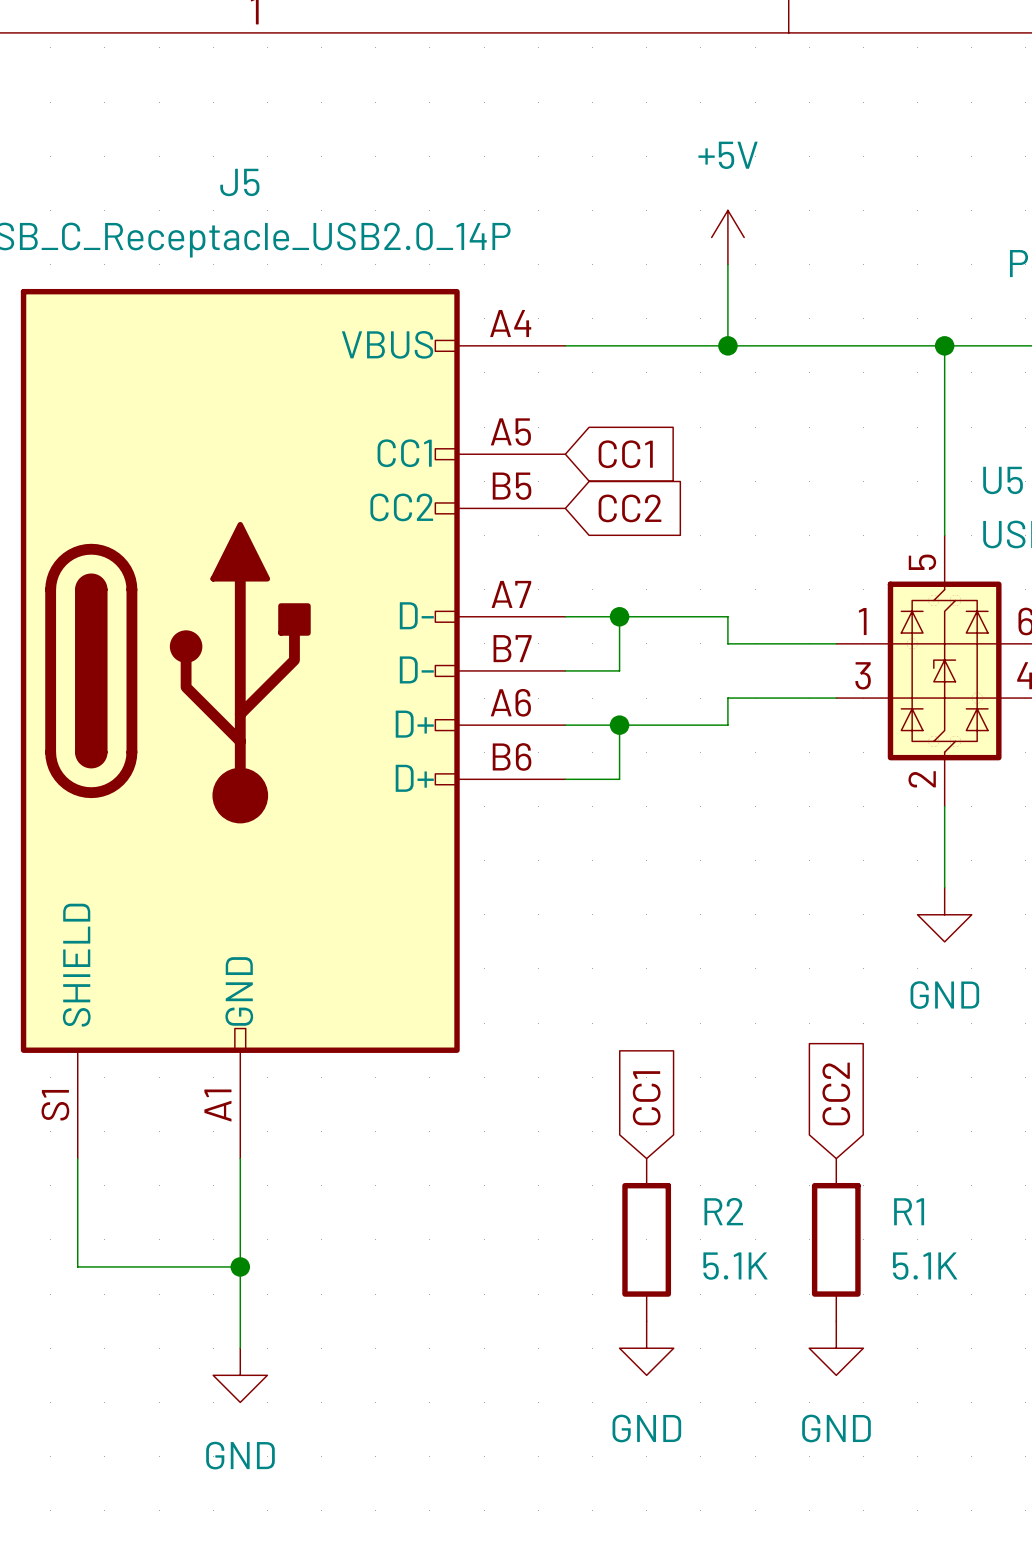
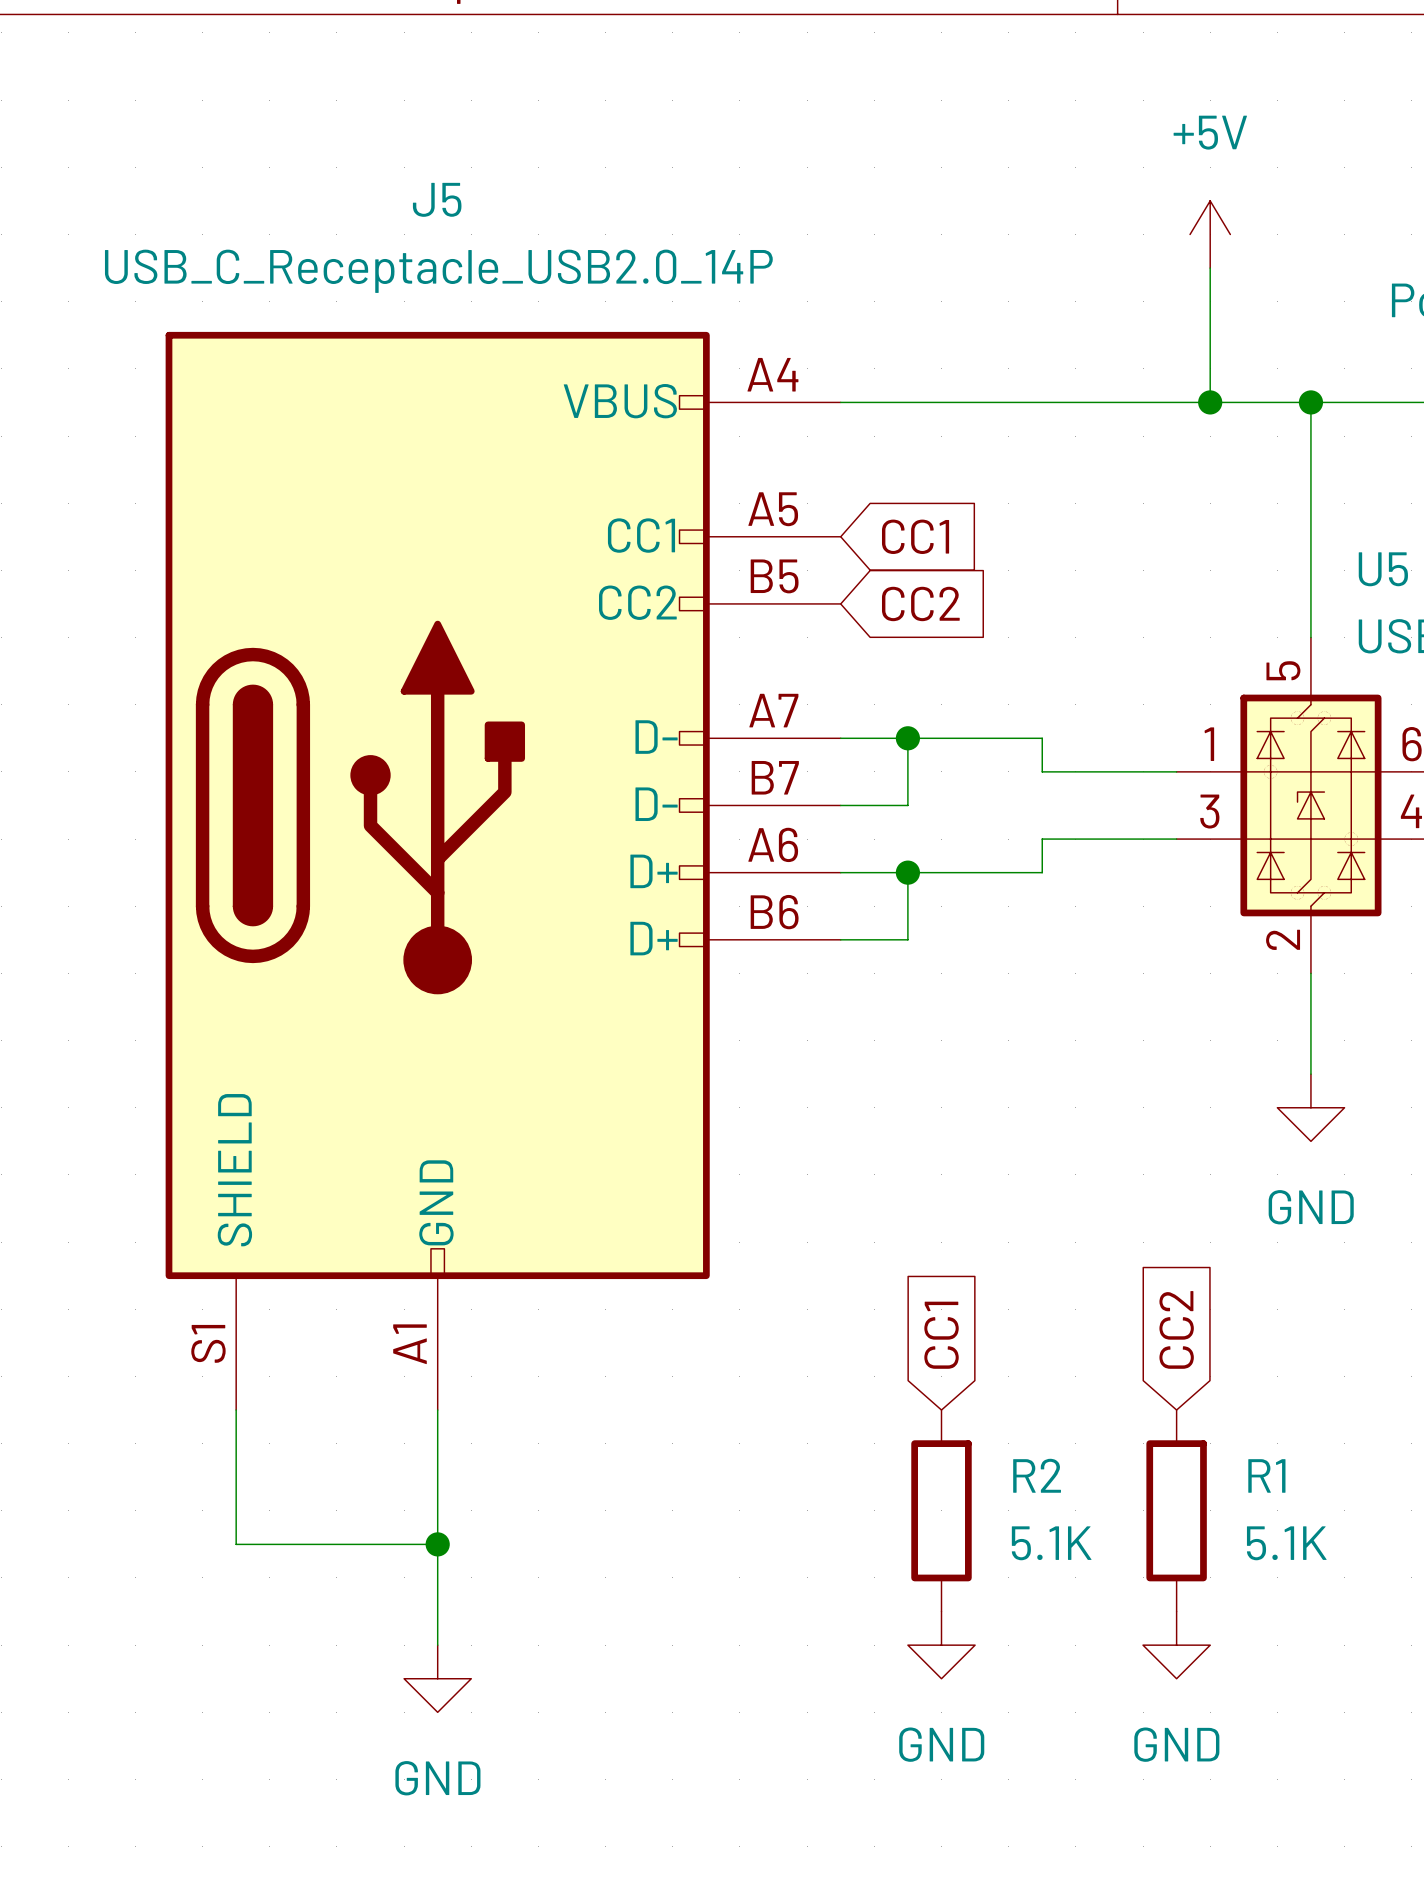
power symbol position: +5V (727, 237) -> +5V (1210, 234)
wire: none -> (1210, 268) (1210, 402)
wire: (727, 264) (727, 345) -> none
junction: (727, 345) -> none
junction: none -> (1210, 402)

